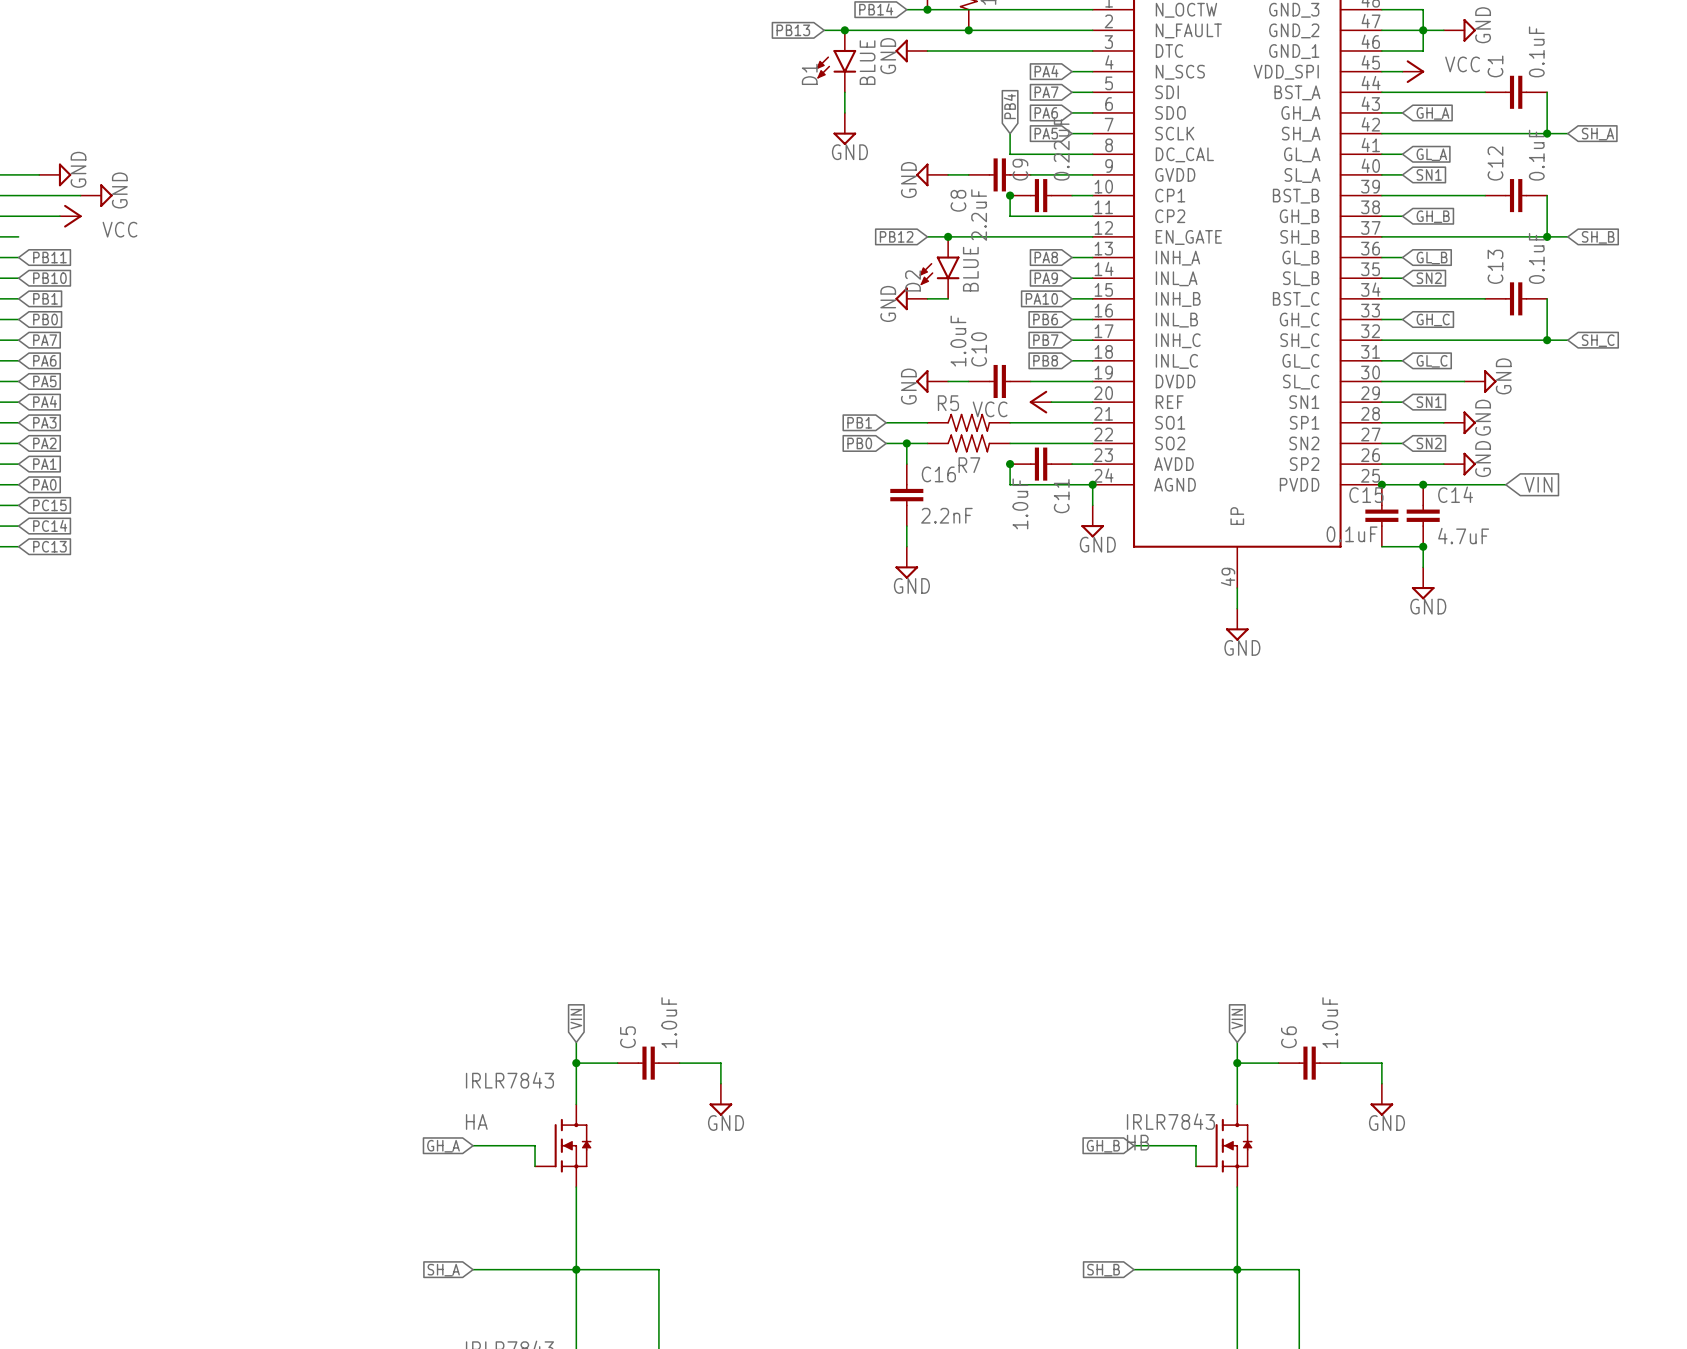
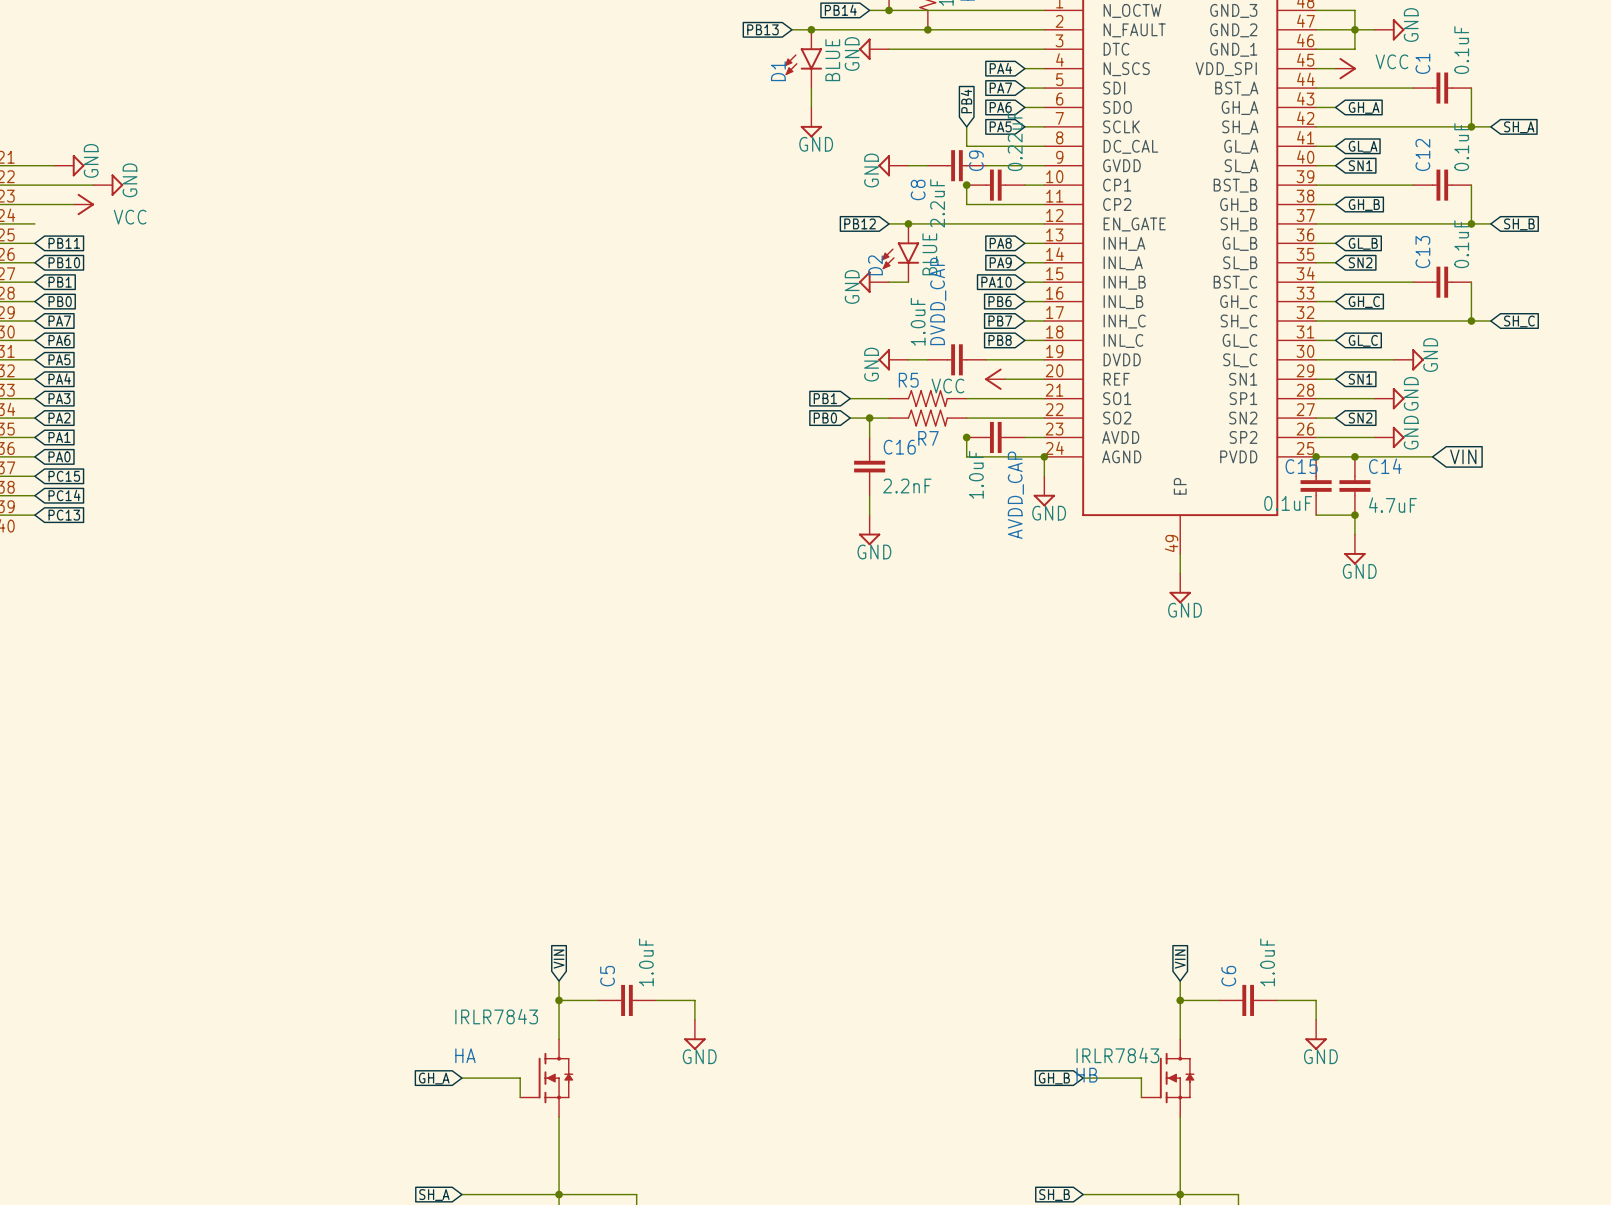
C10 name: C10 (979, 349) -> DVDD_CAP (938, 301)
C11 name: C11 (1061, 496) -> AVDD_CAP (1015, 495)

